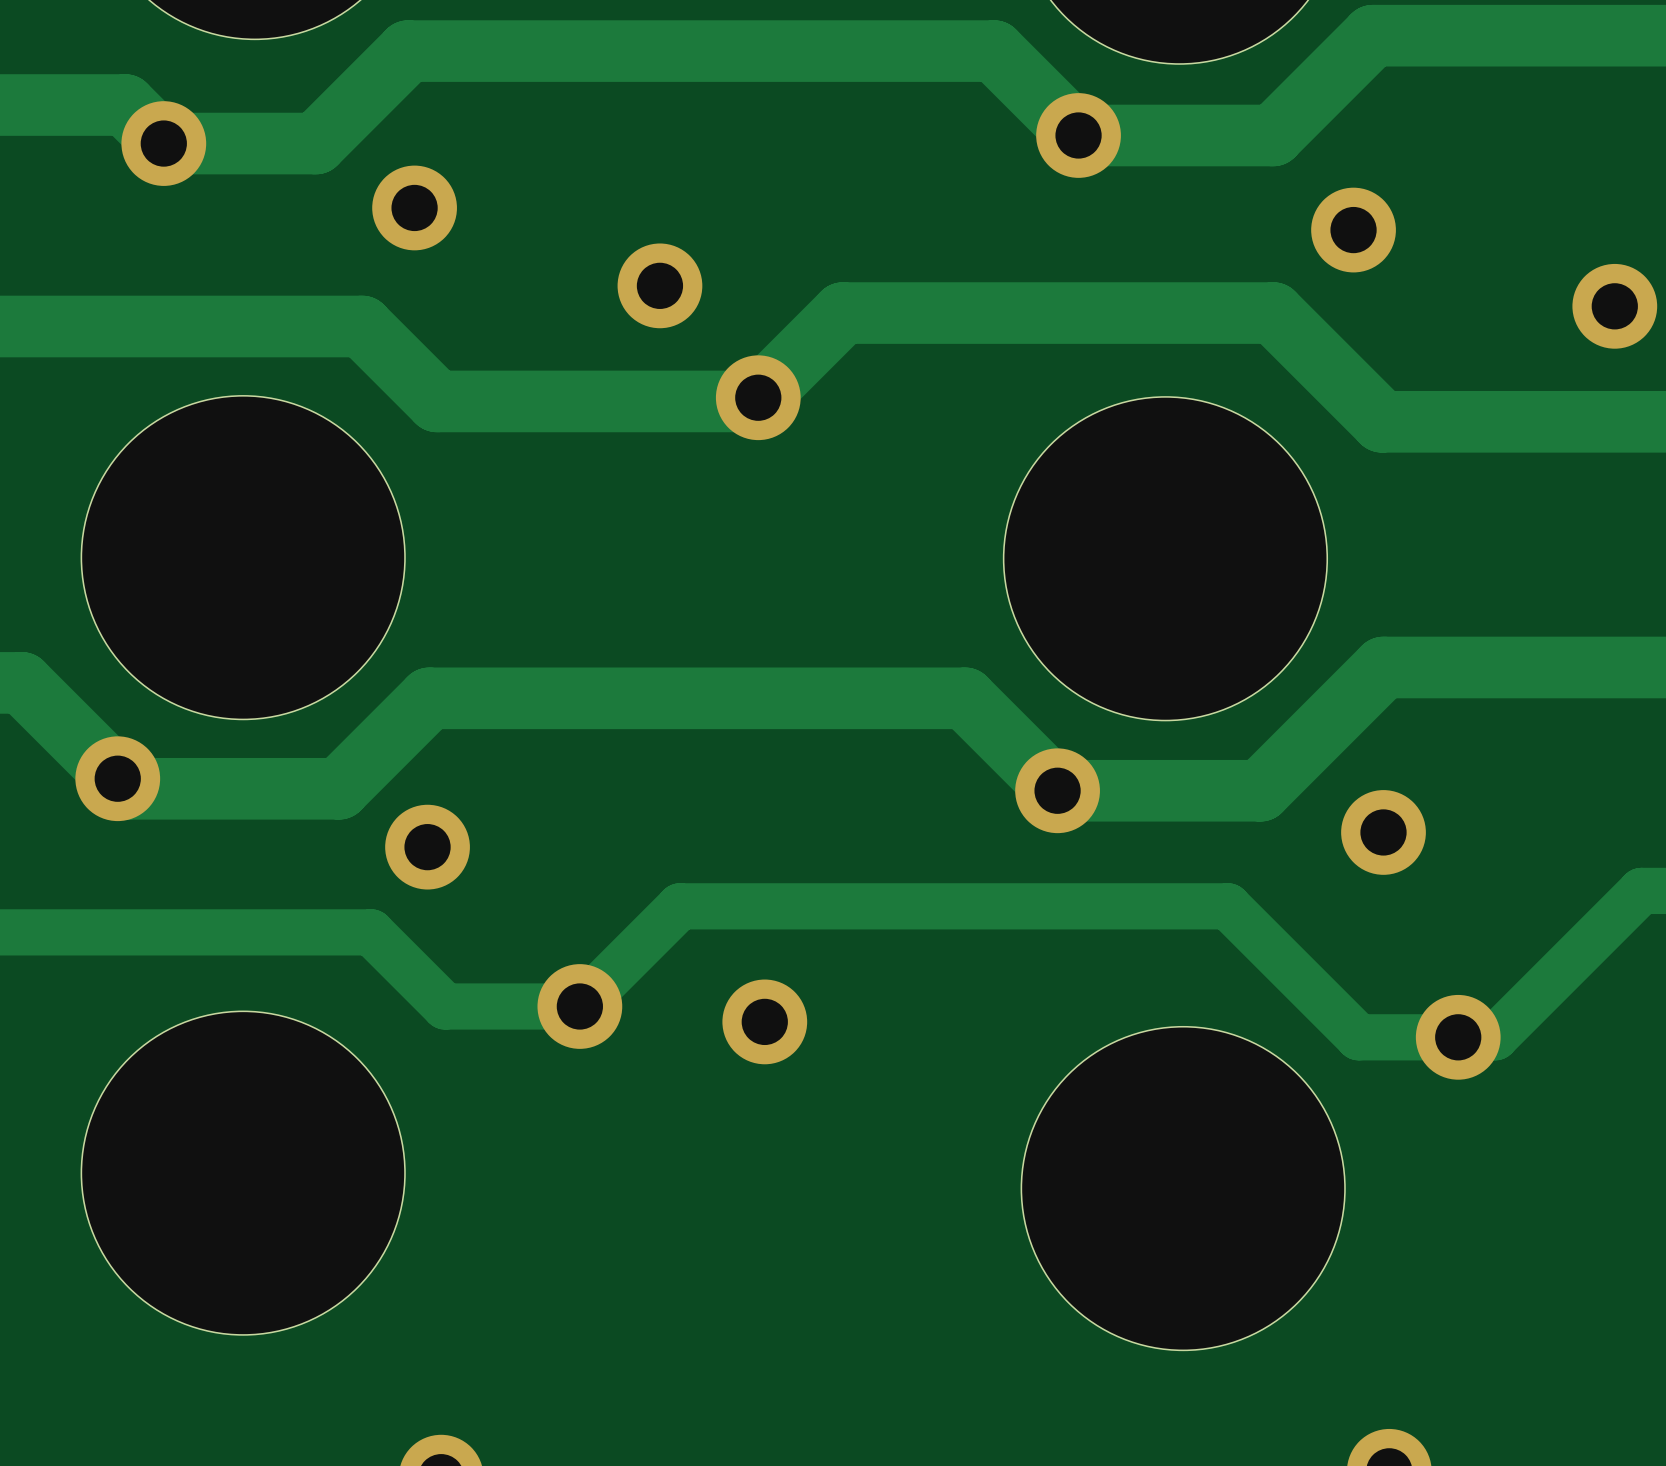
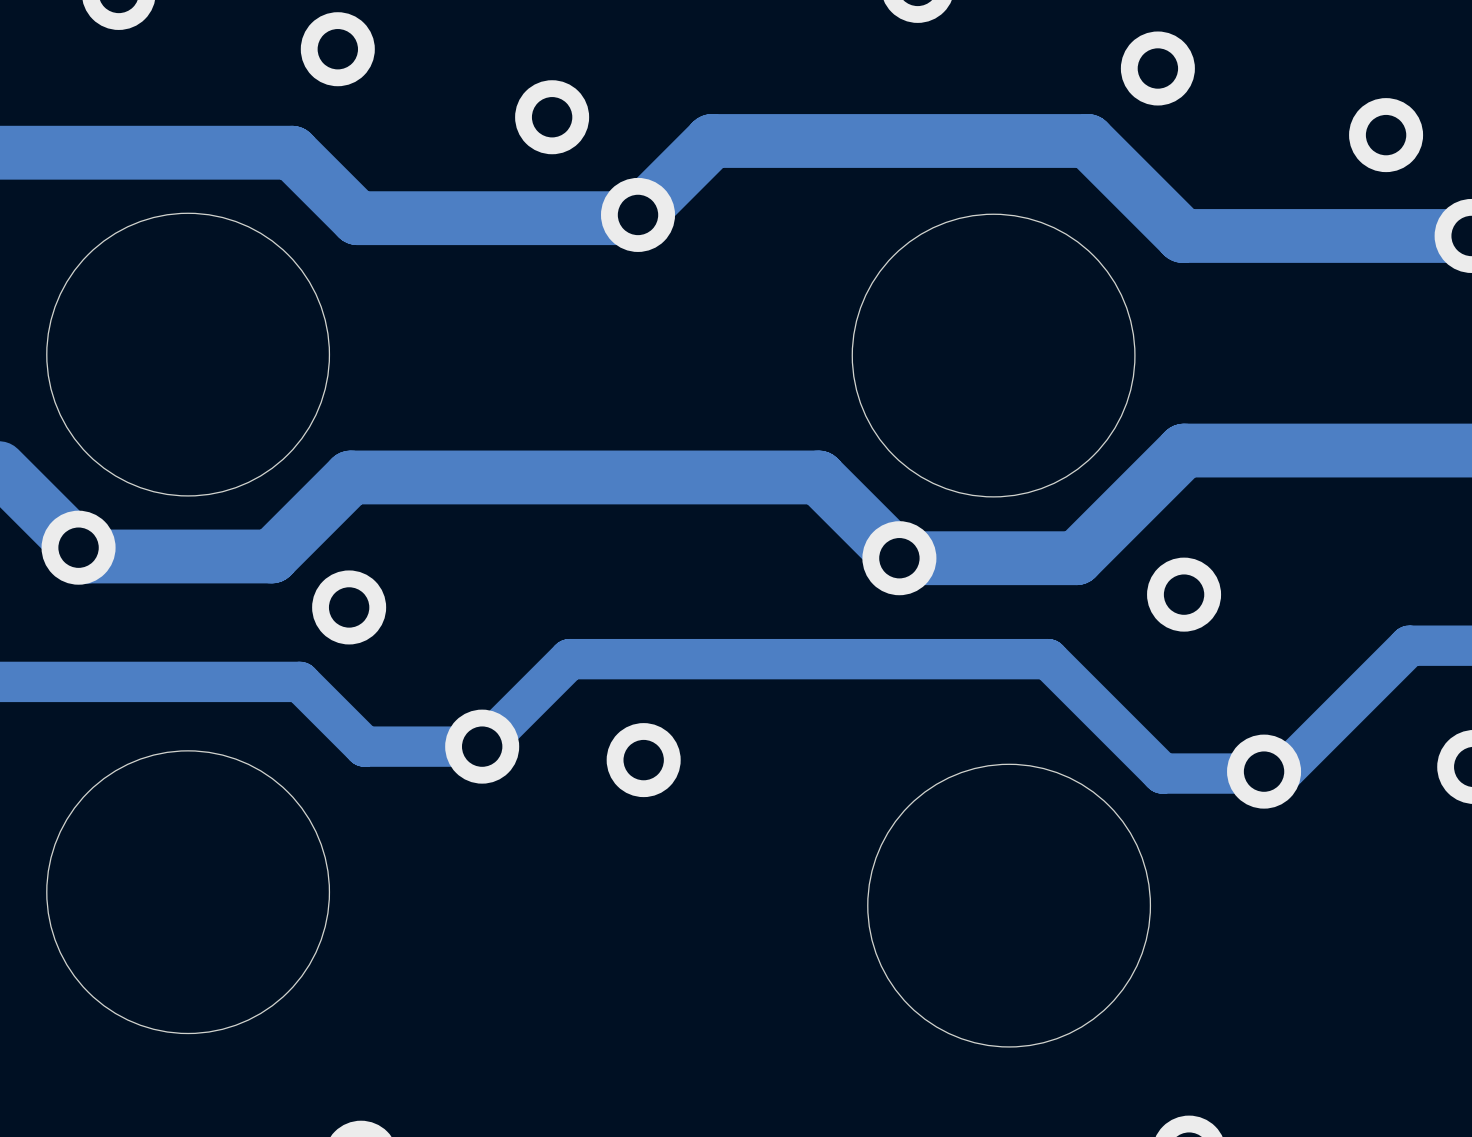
via position: (1458, 1037) -> (1264, 771)

